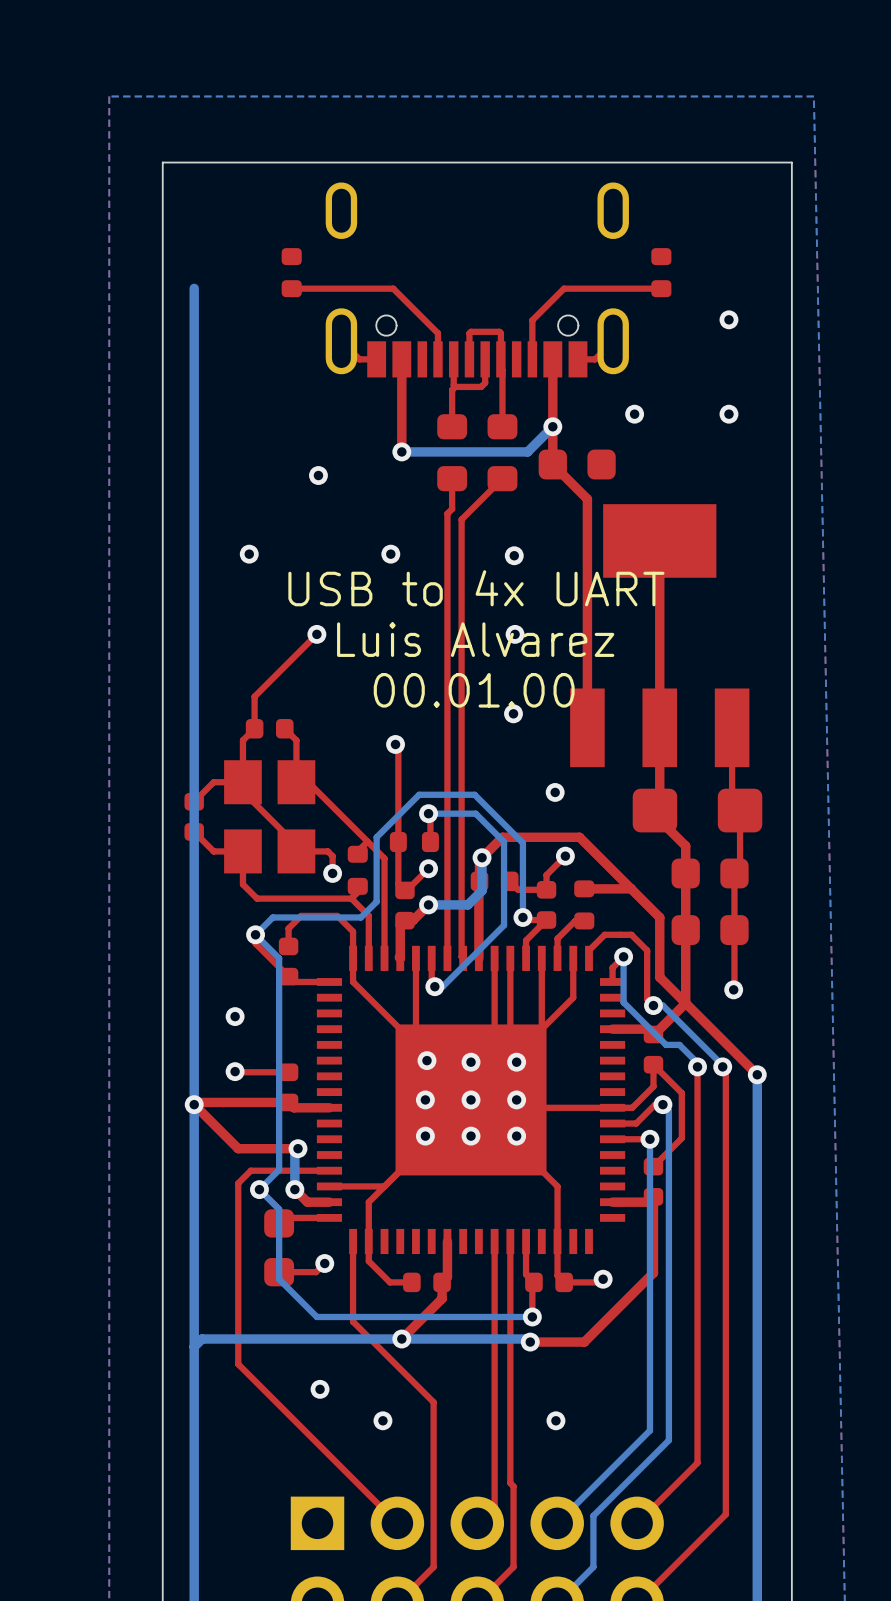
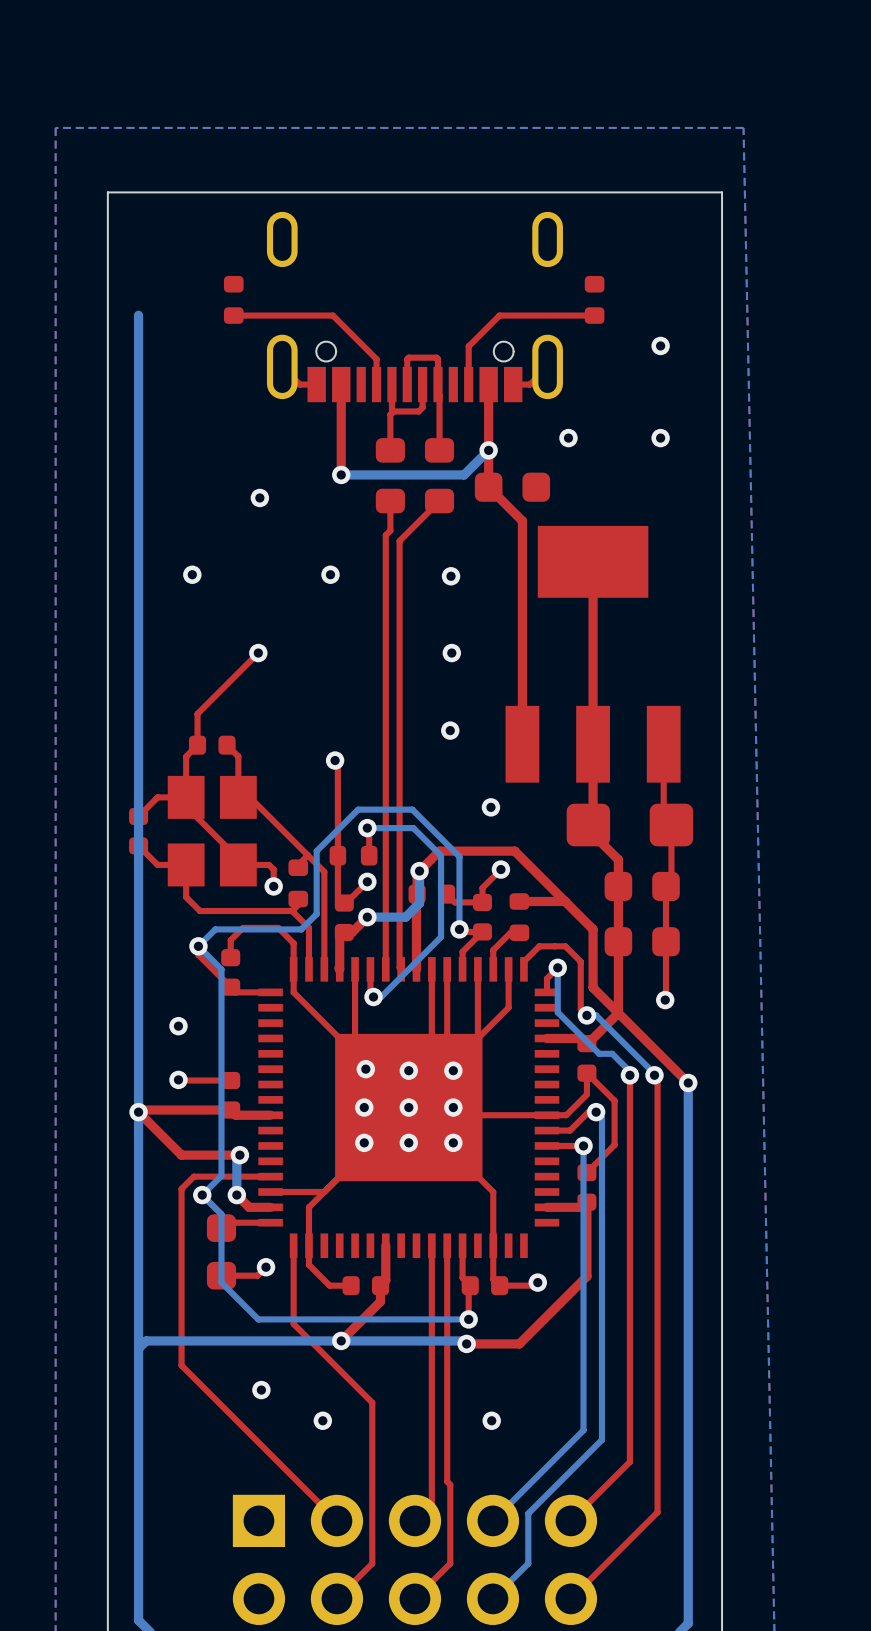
text: USB to 4x UART (476, 588) -> none
text: Luis Alvarez (475, 639) -> none
text: 00.01.00 (474, 690) -> none

